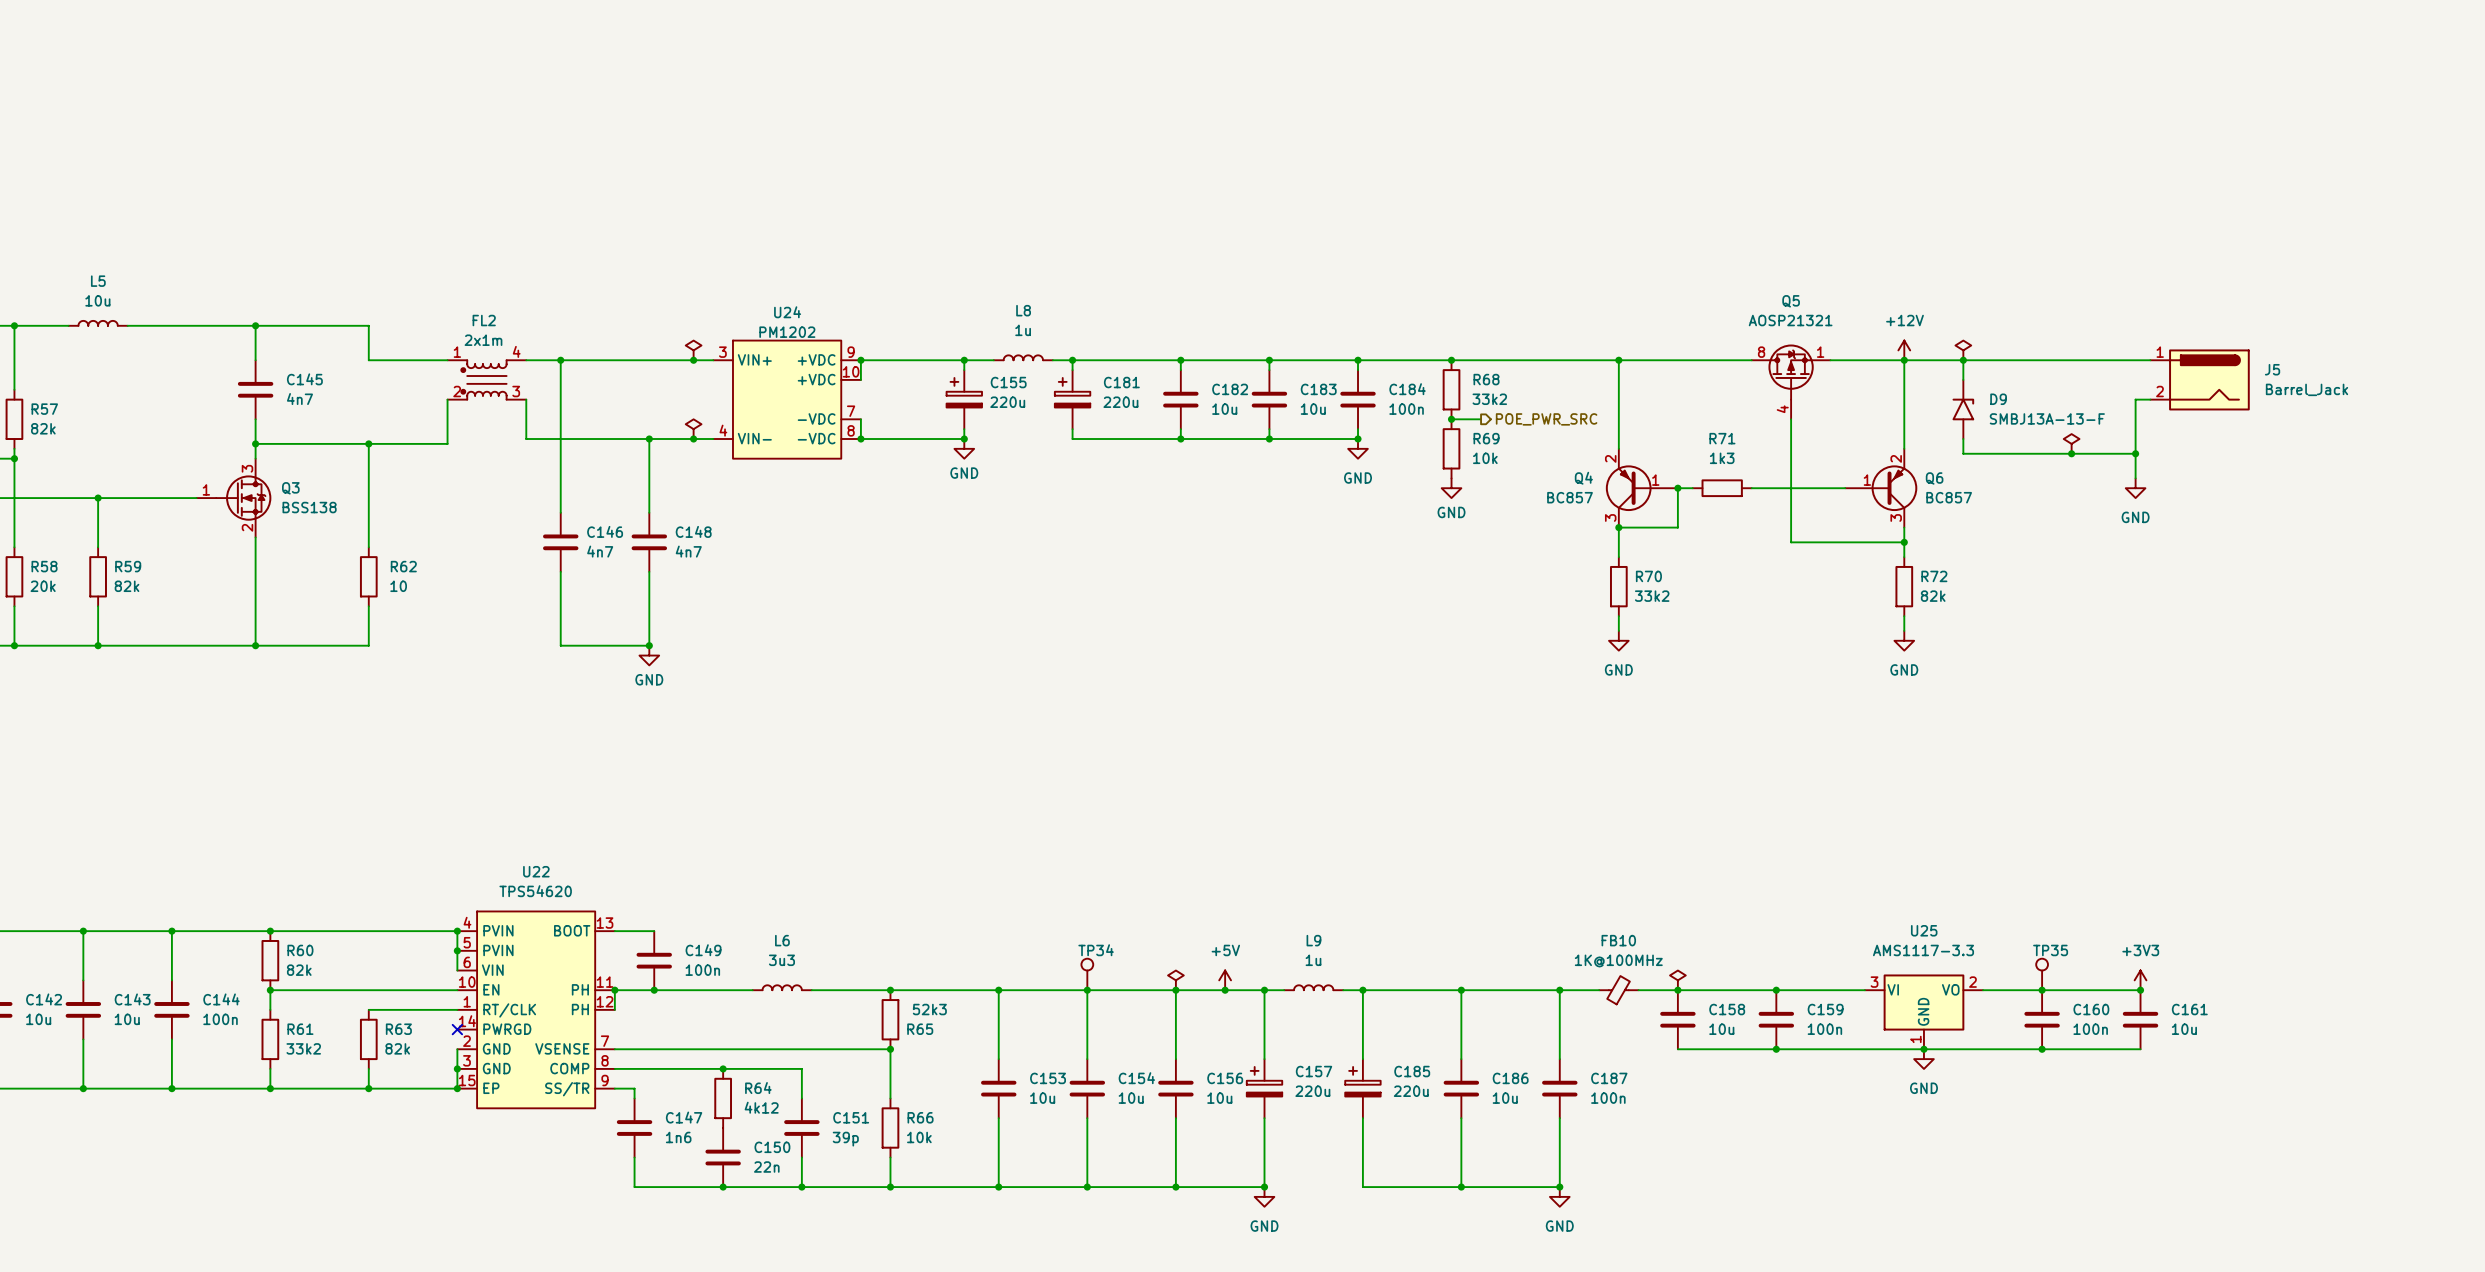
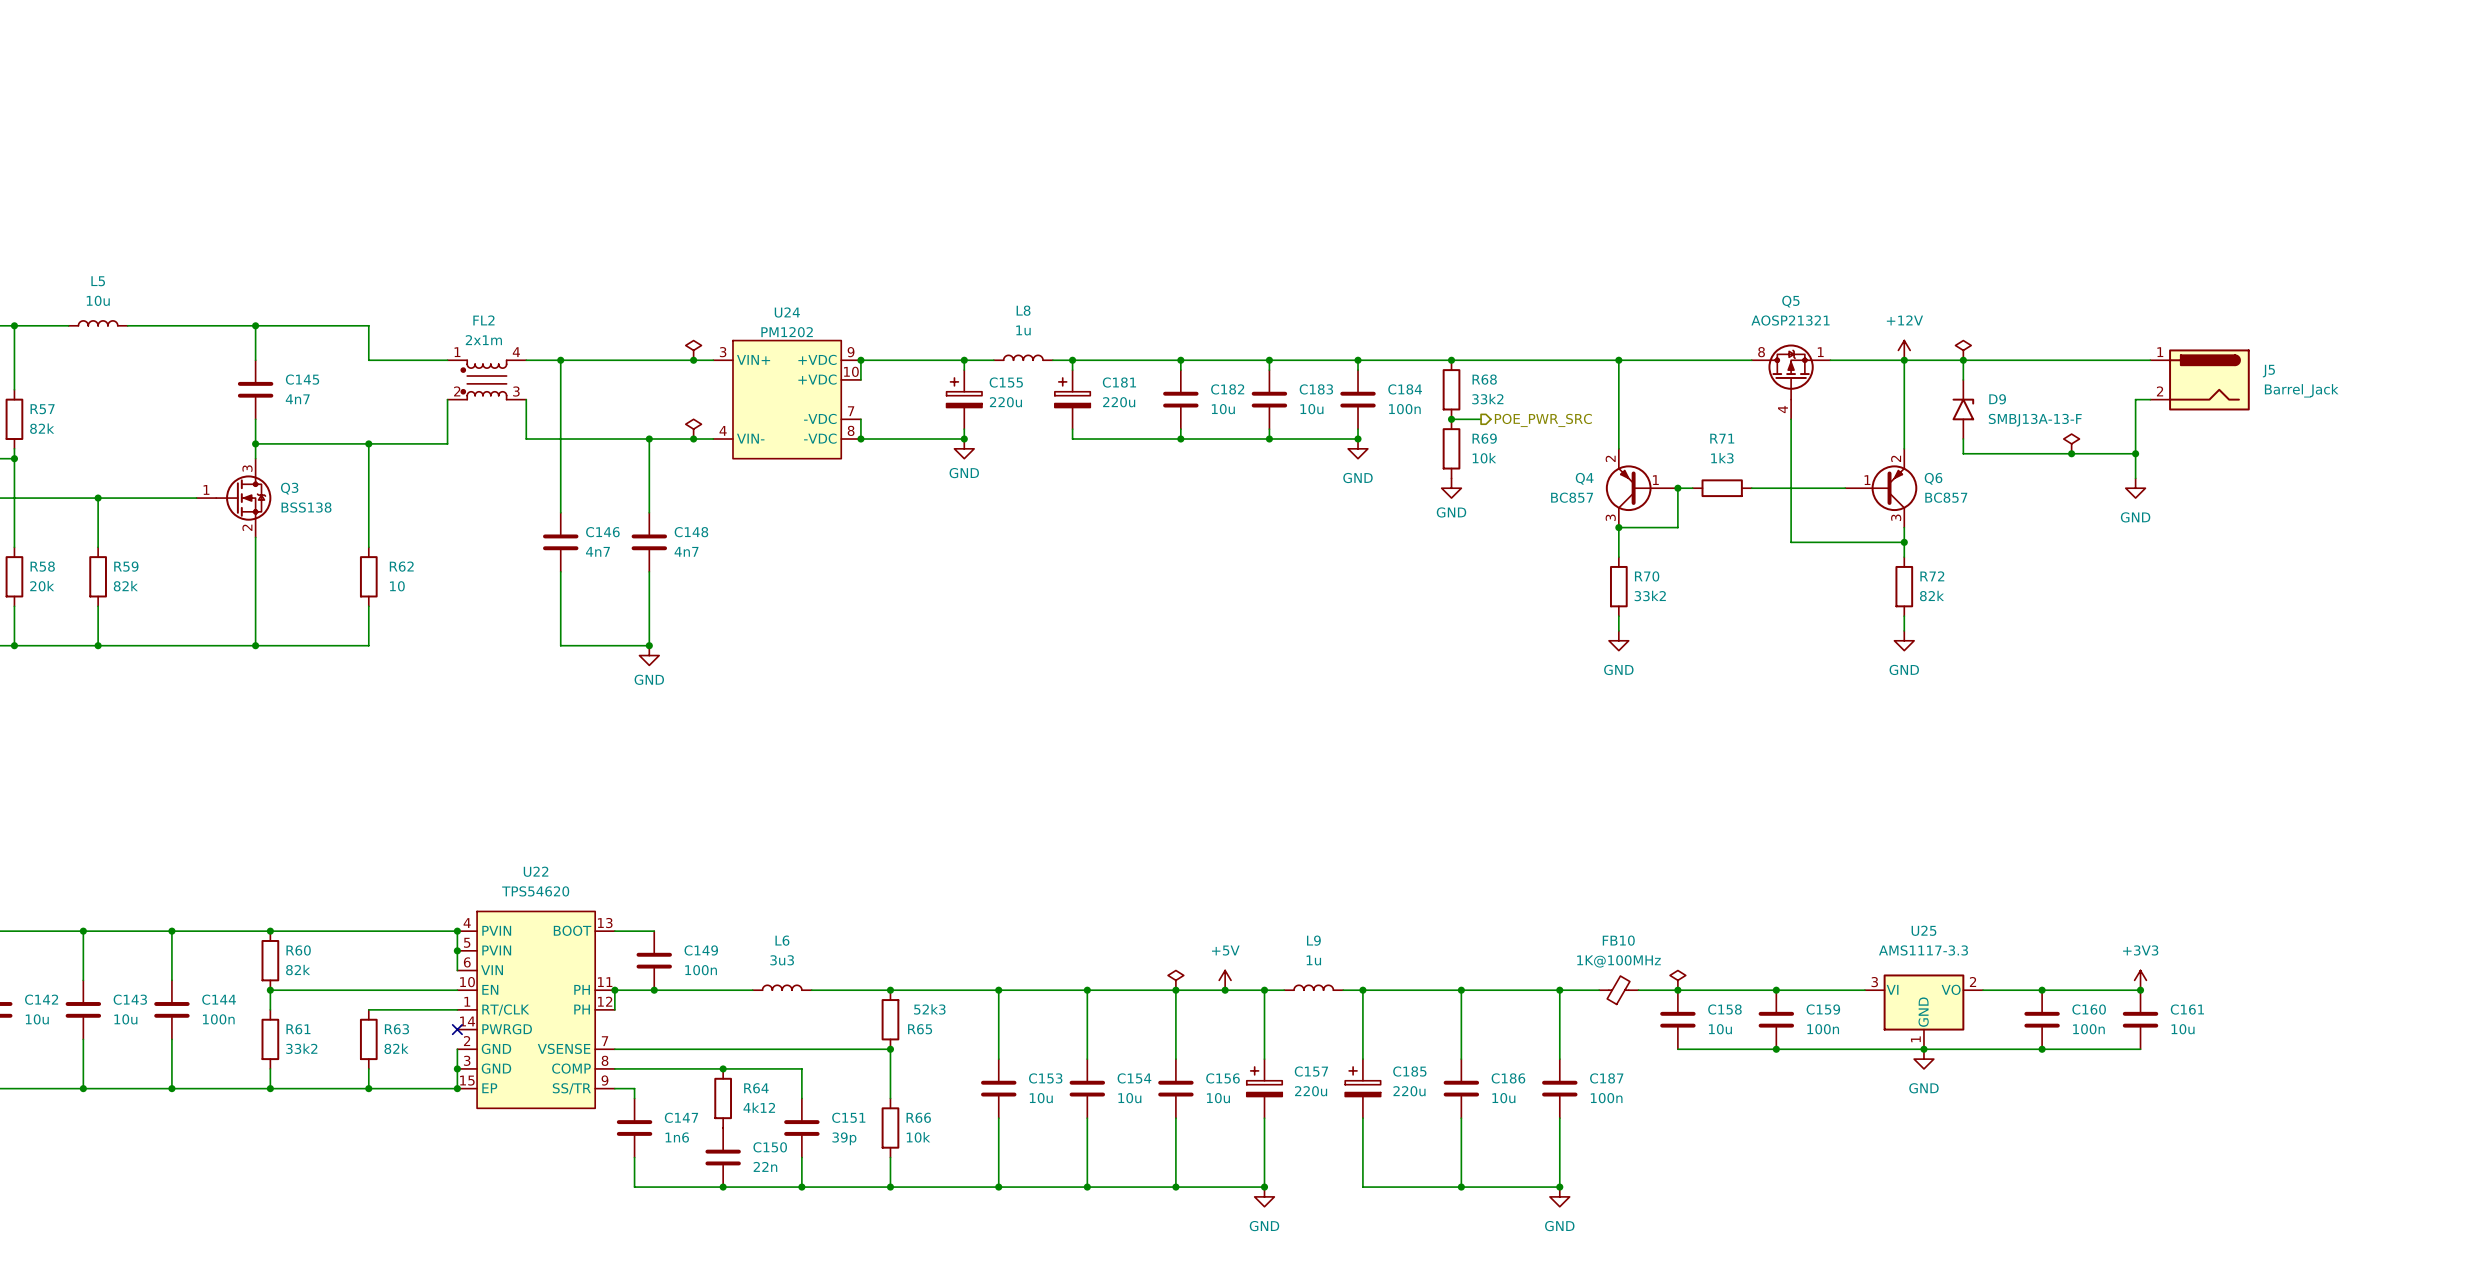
TP34: (1087, 974) -> none
TP35: (2042, 974) -> none

